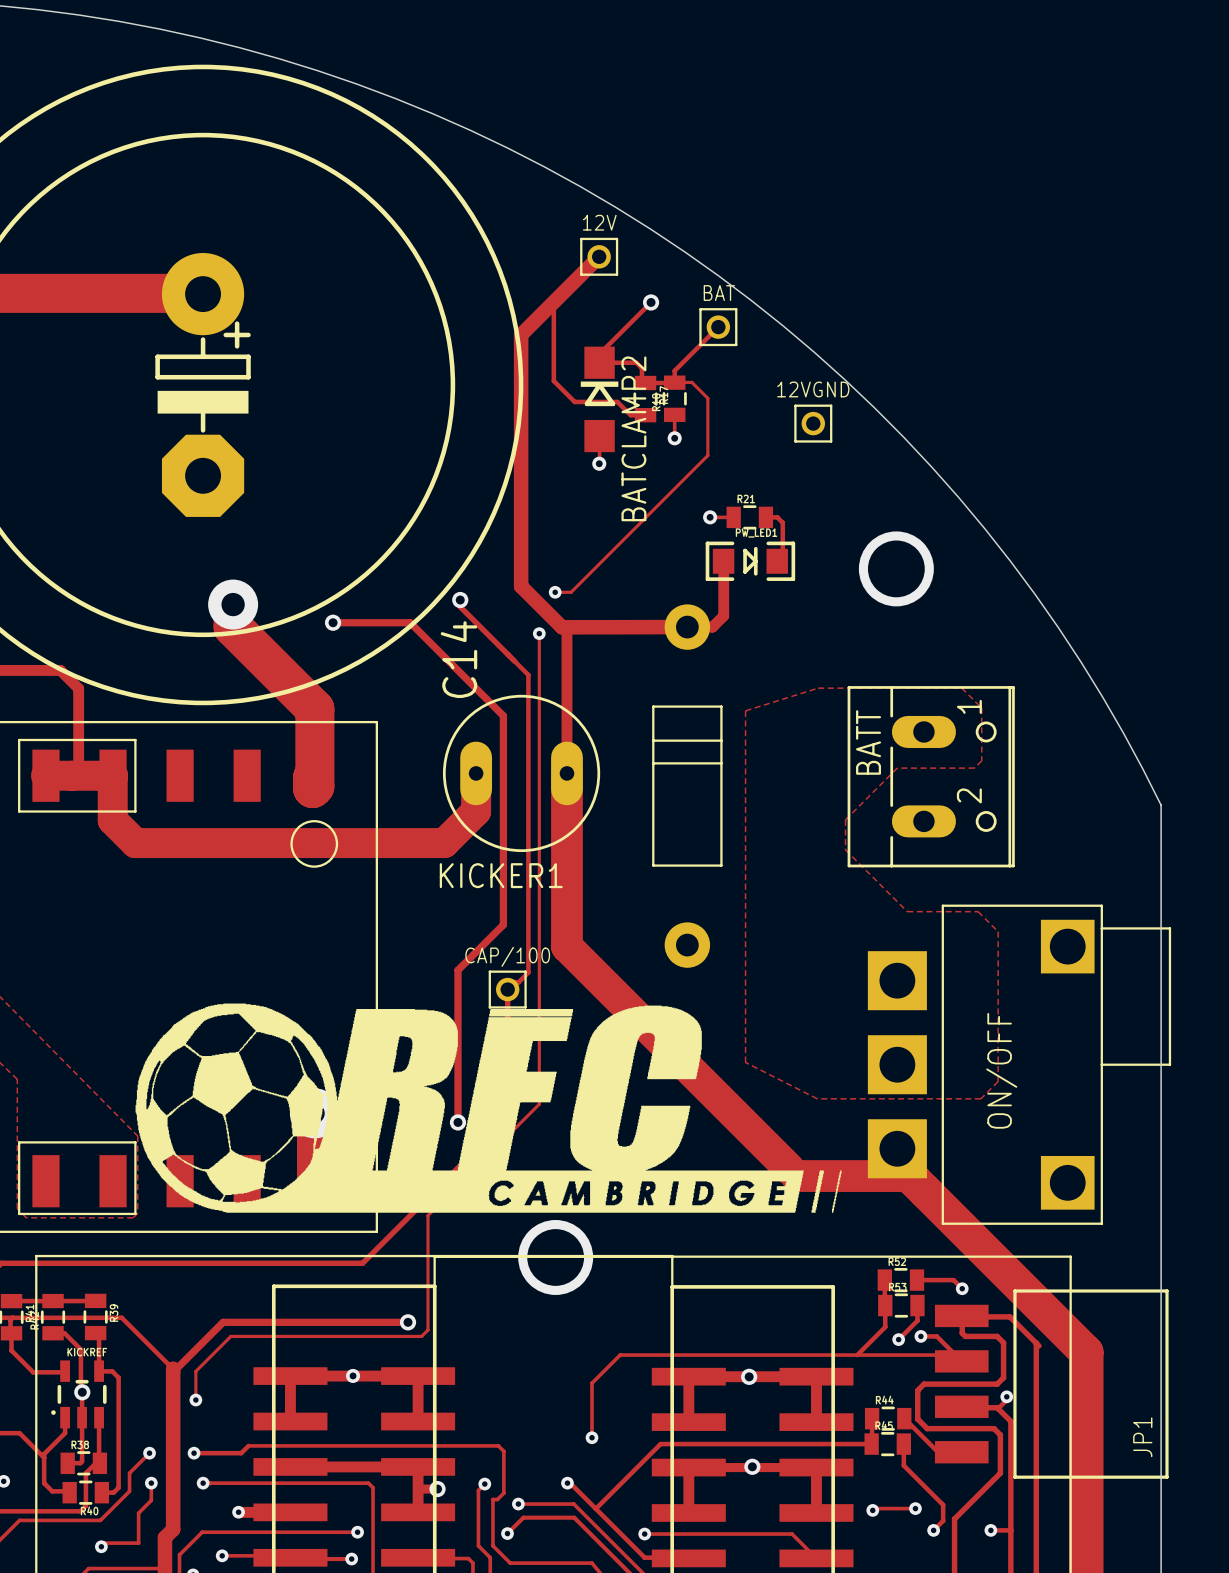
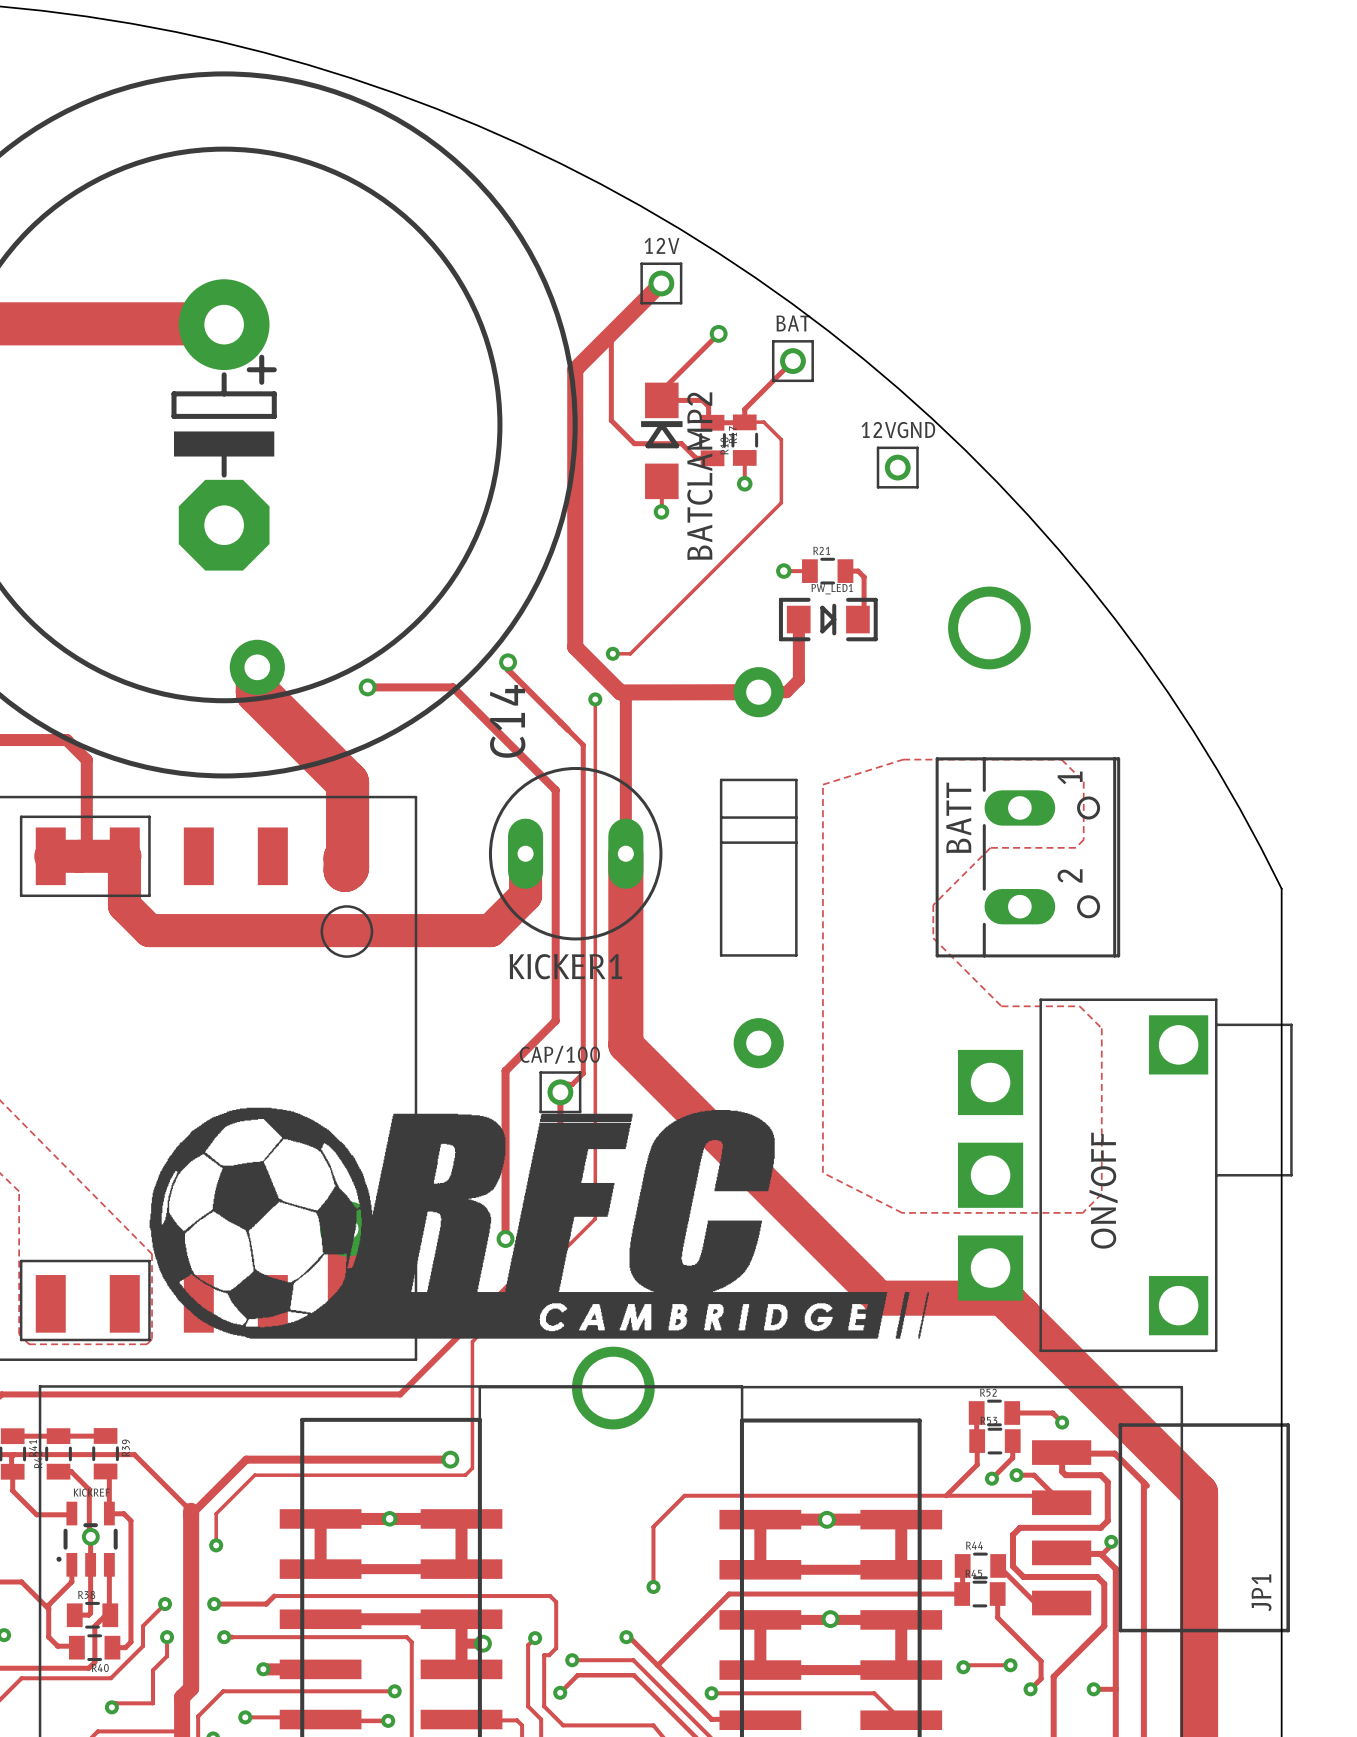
track: none -> (320, 1569) (461, 1569)
track: none -> (760, 1569) (901, 1569)
track: none -> (760, 1670) (901, 1670)

